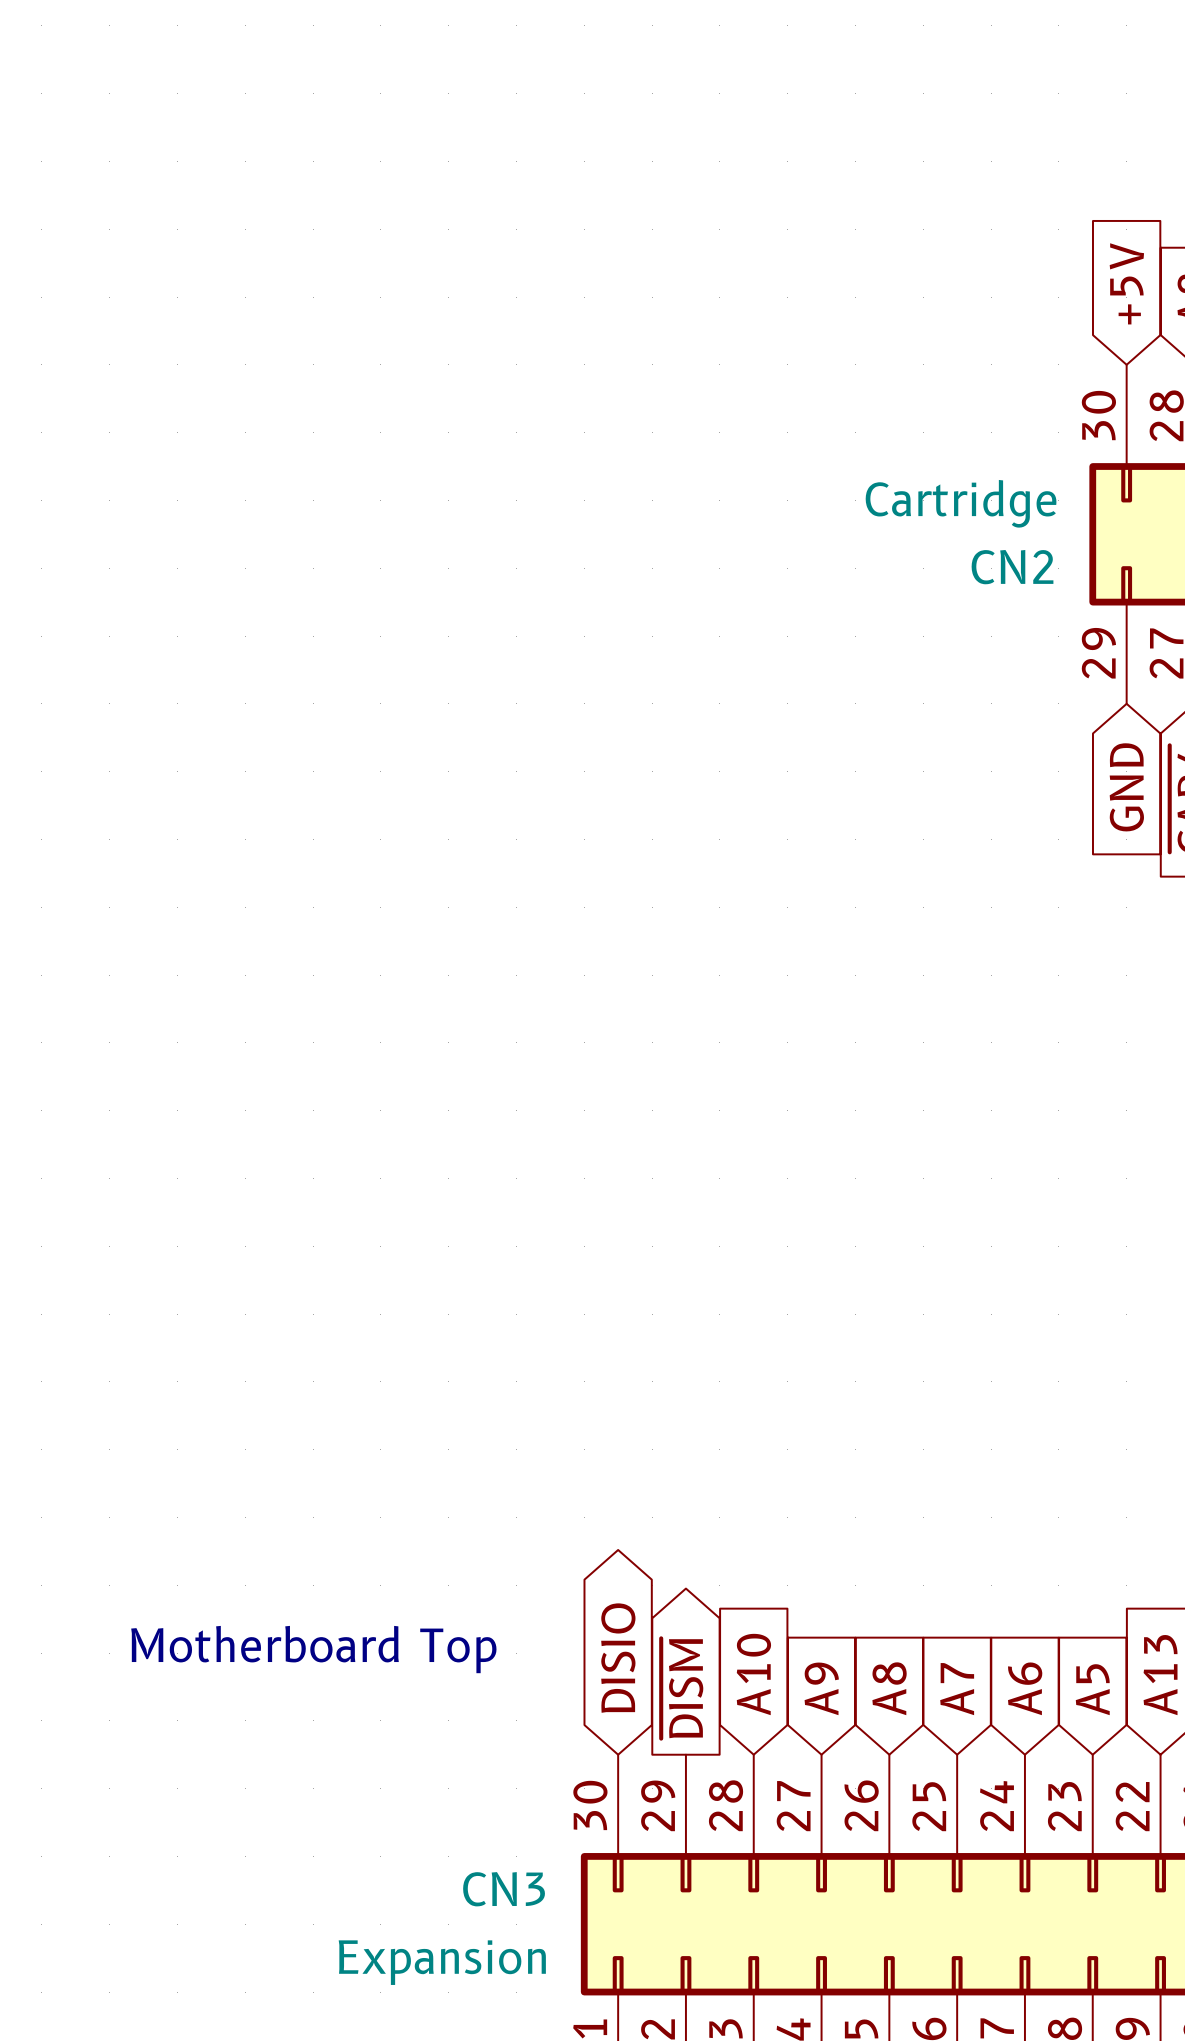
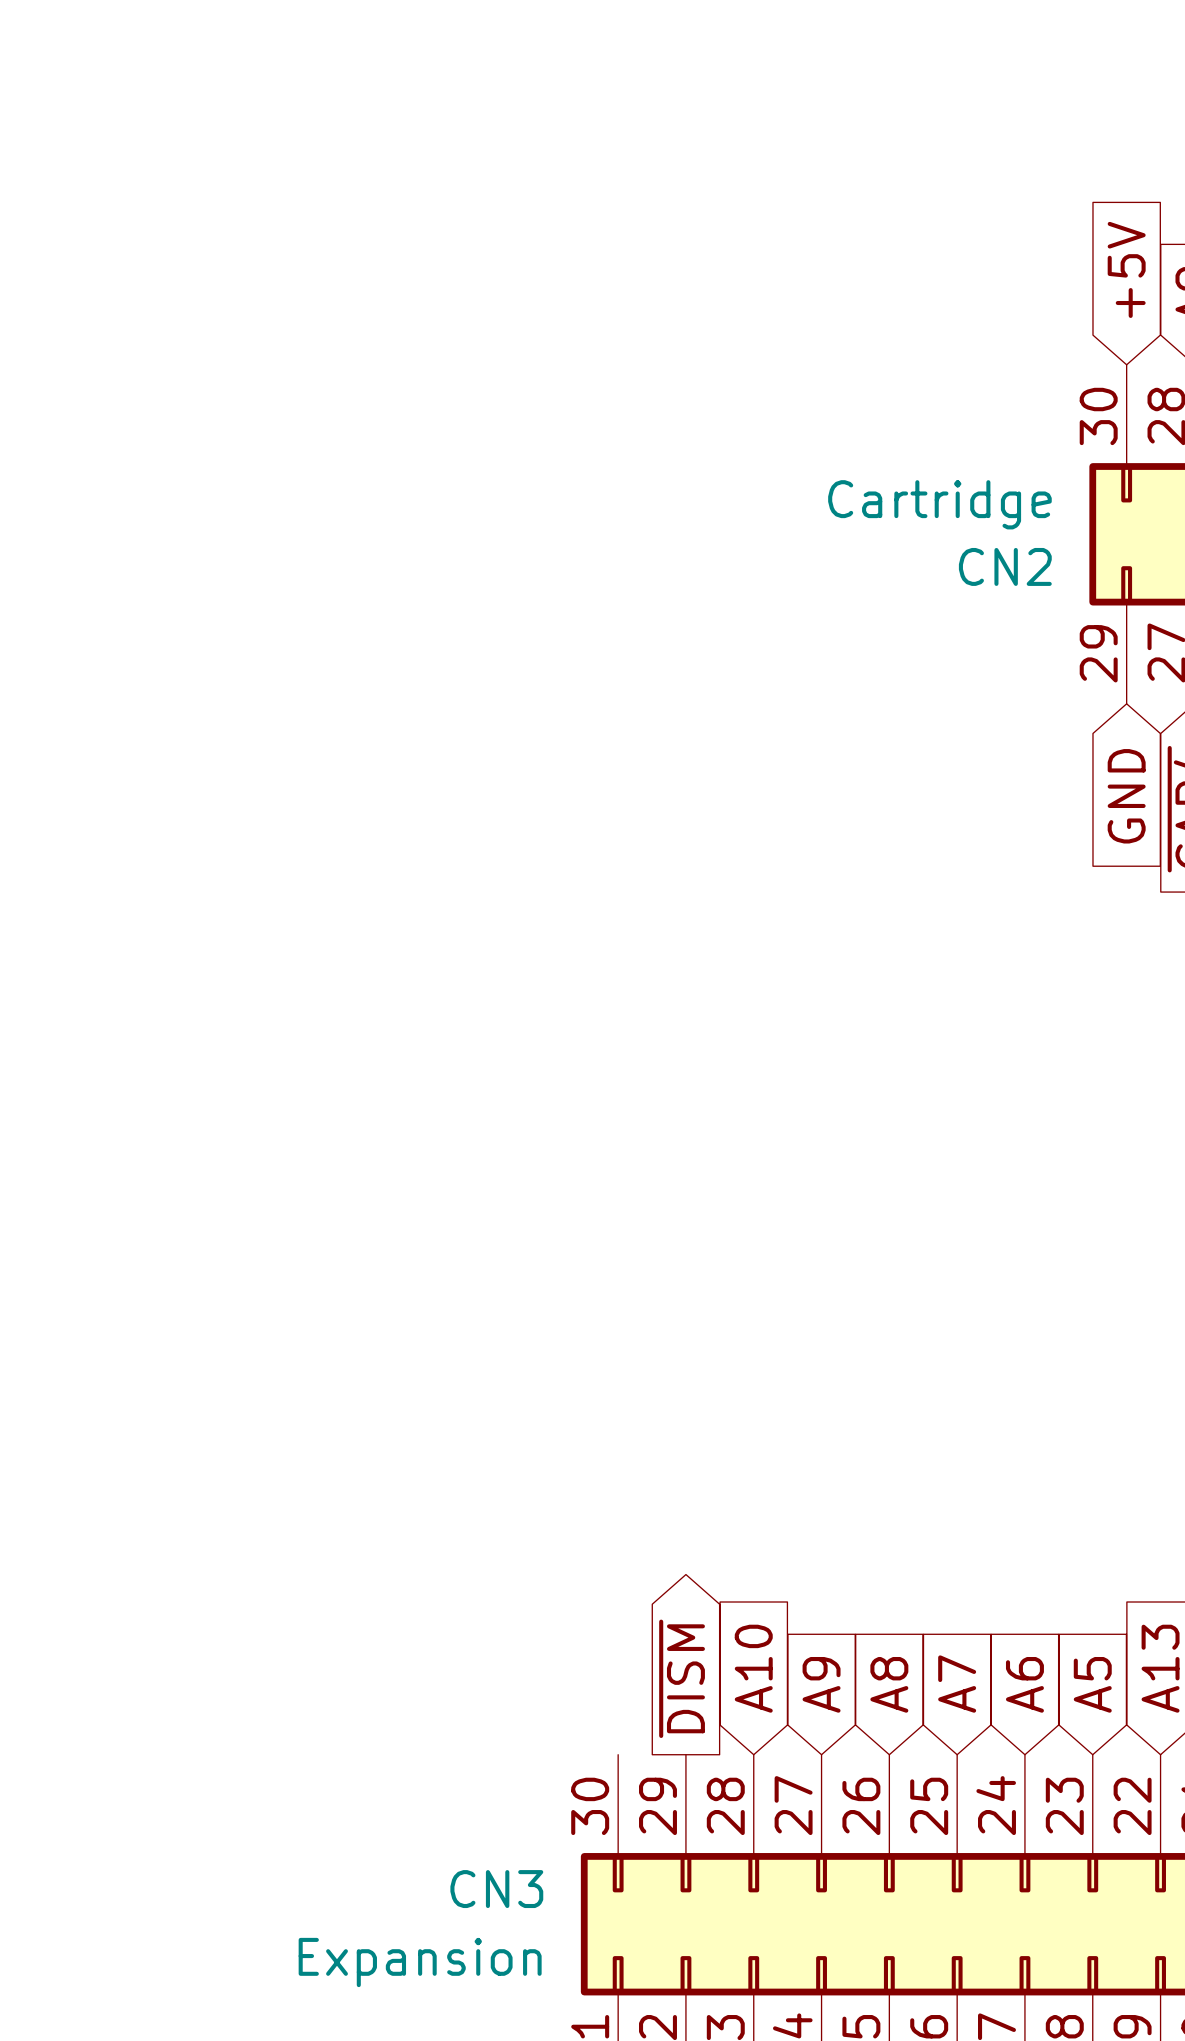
text: Motherboard Top (313, 1649) -> none
global label: DISIO (618, 1658) -> none

